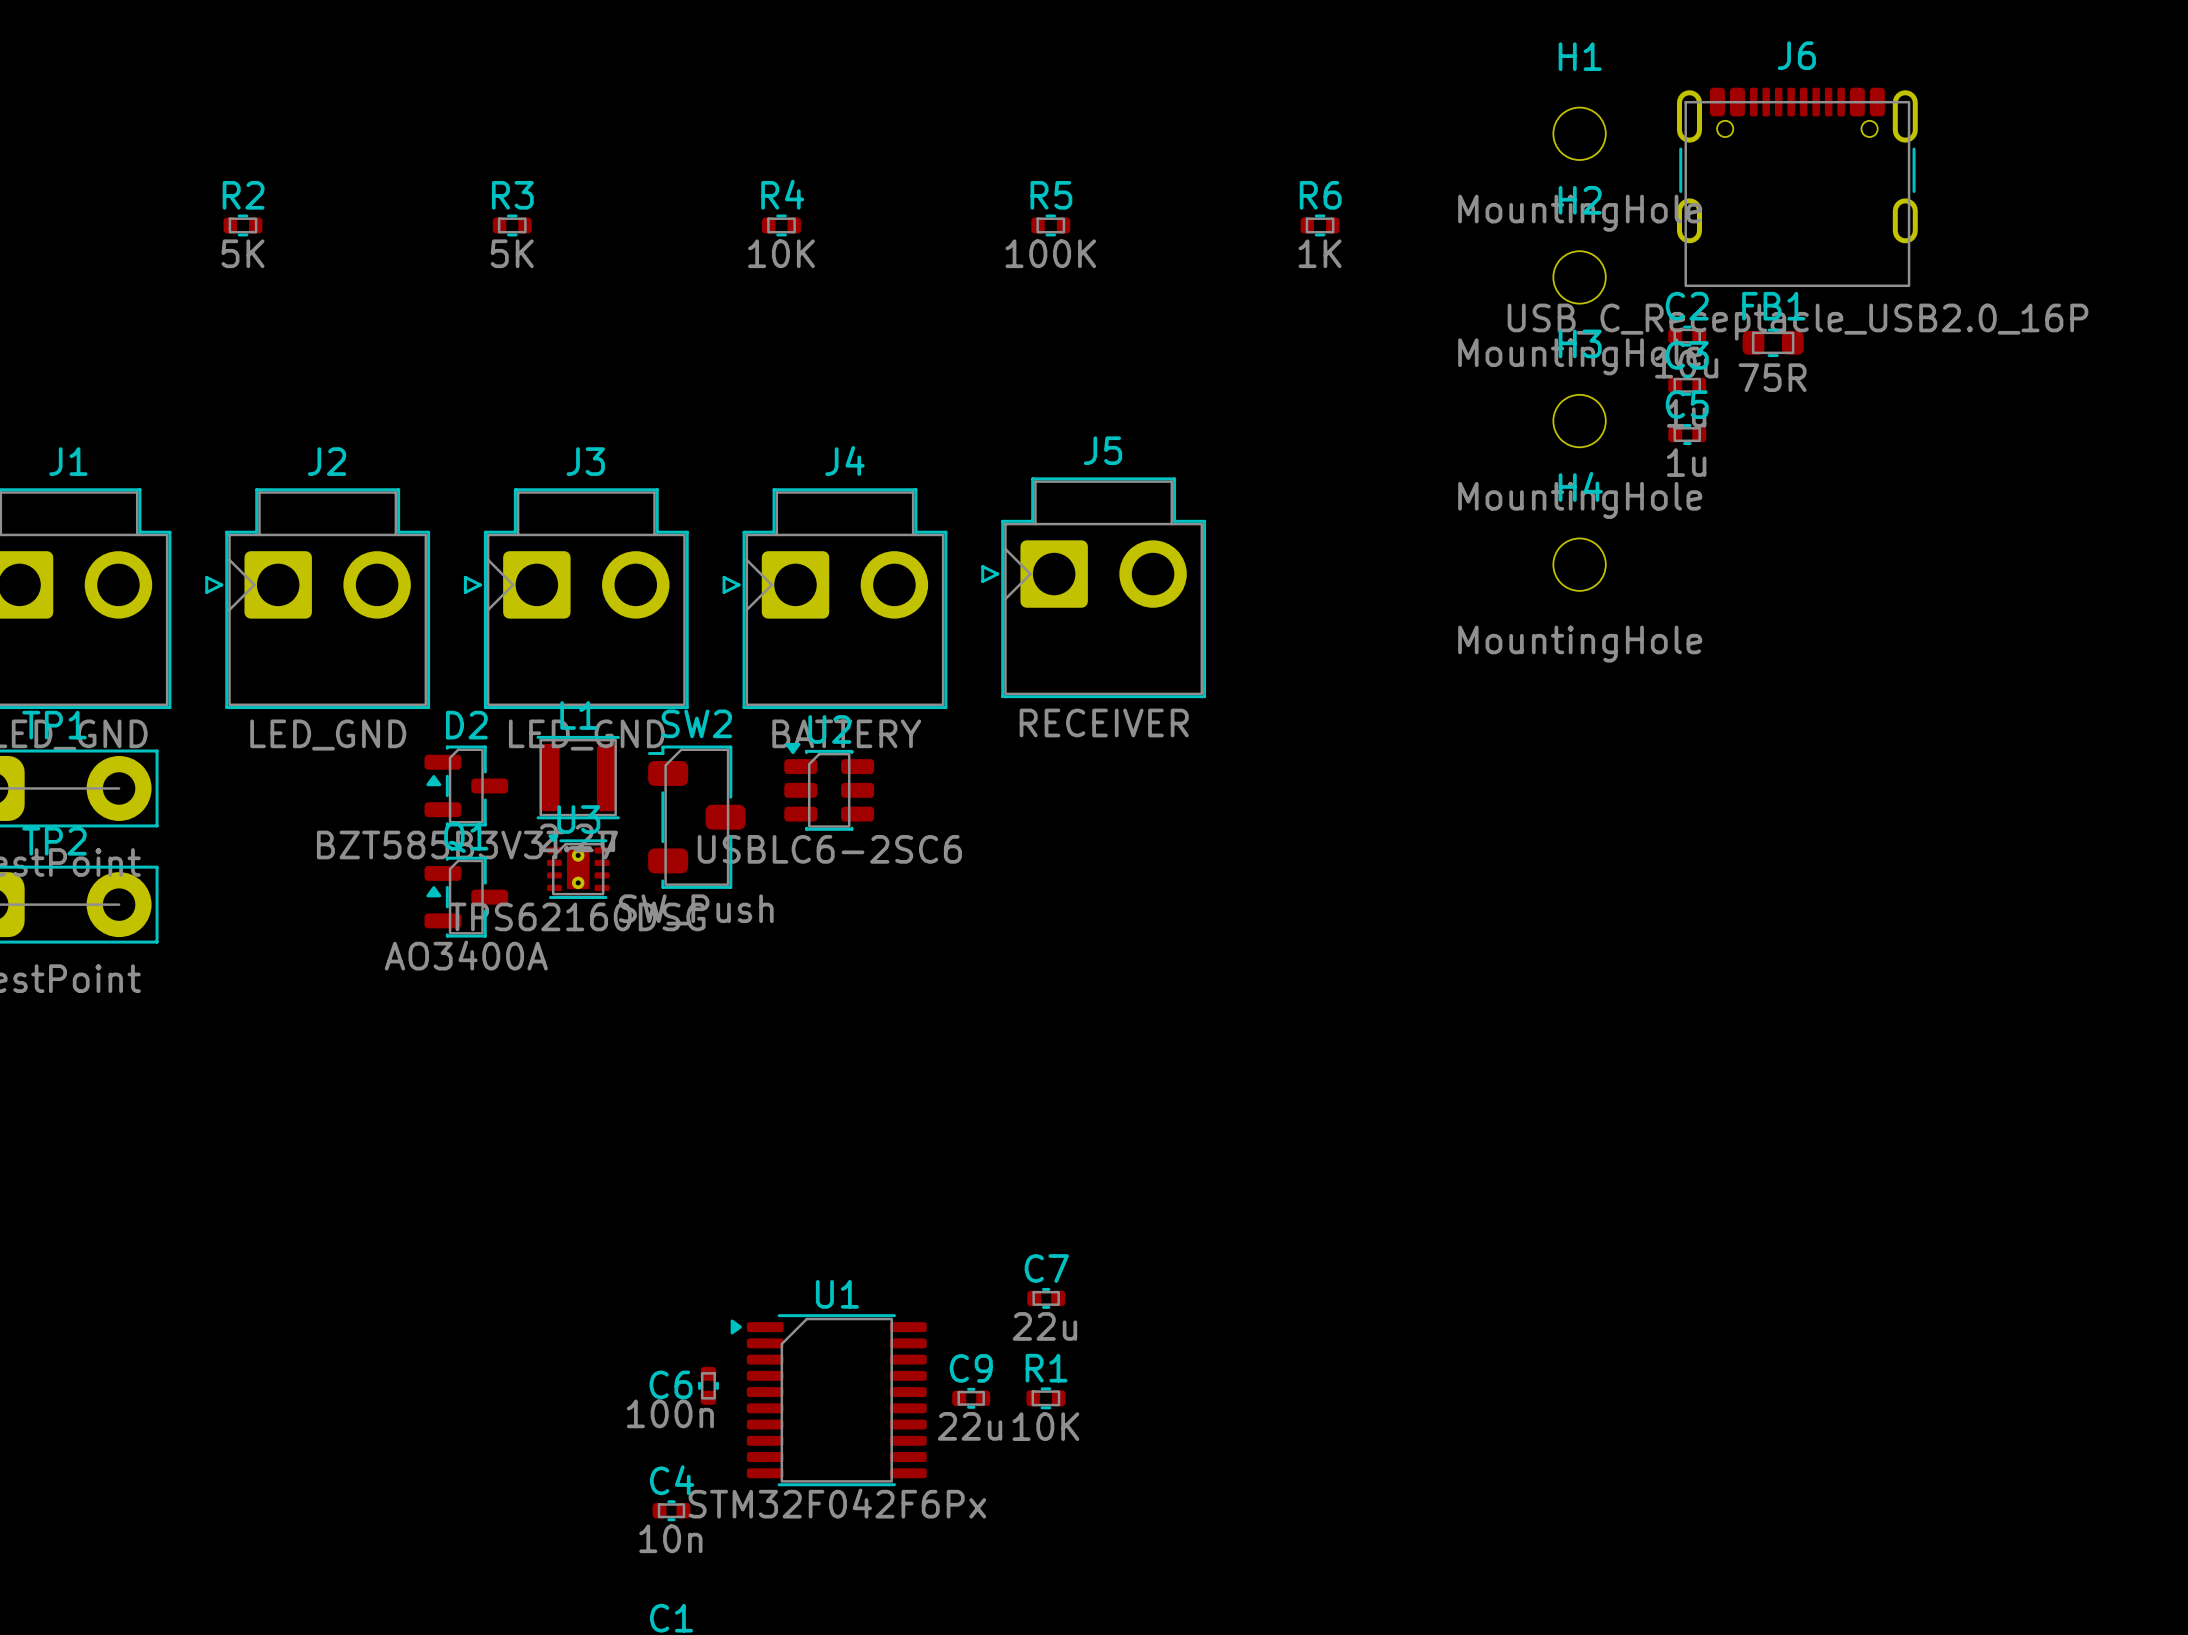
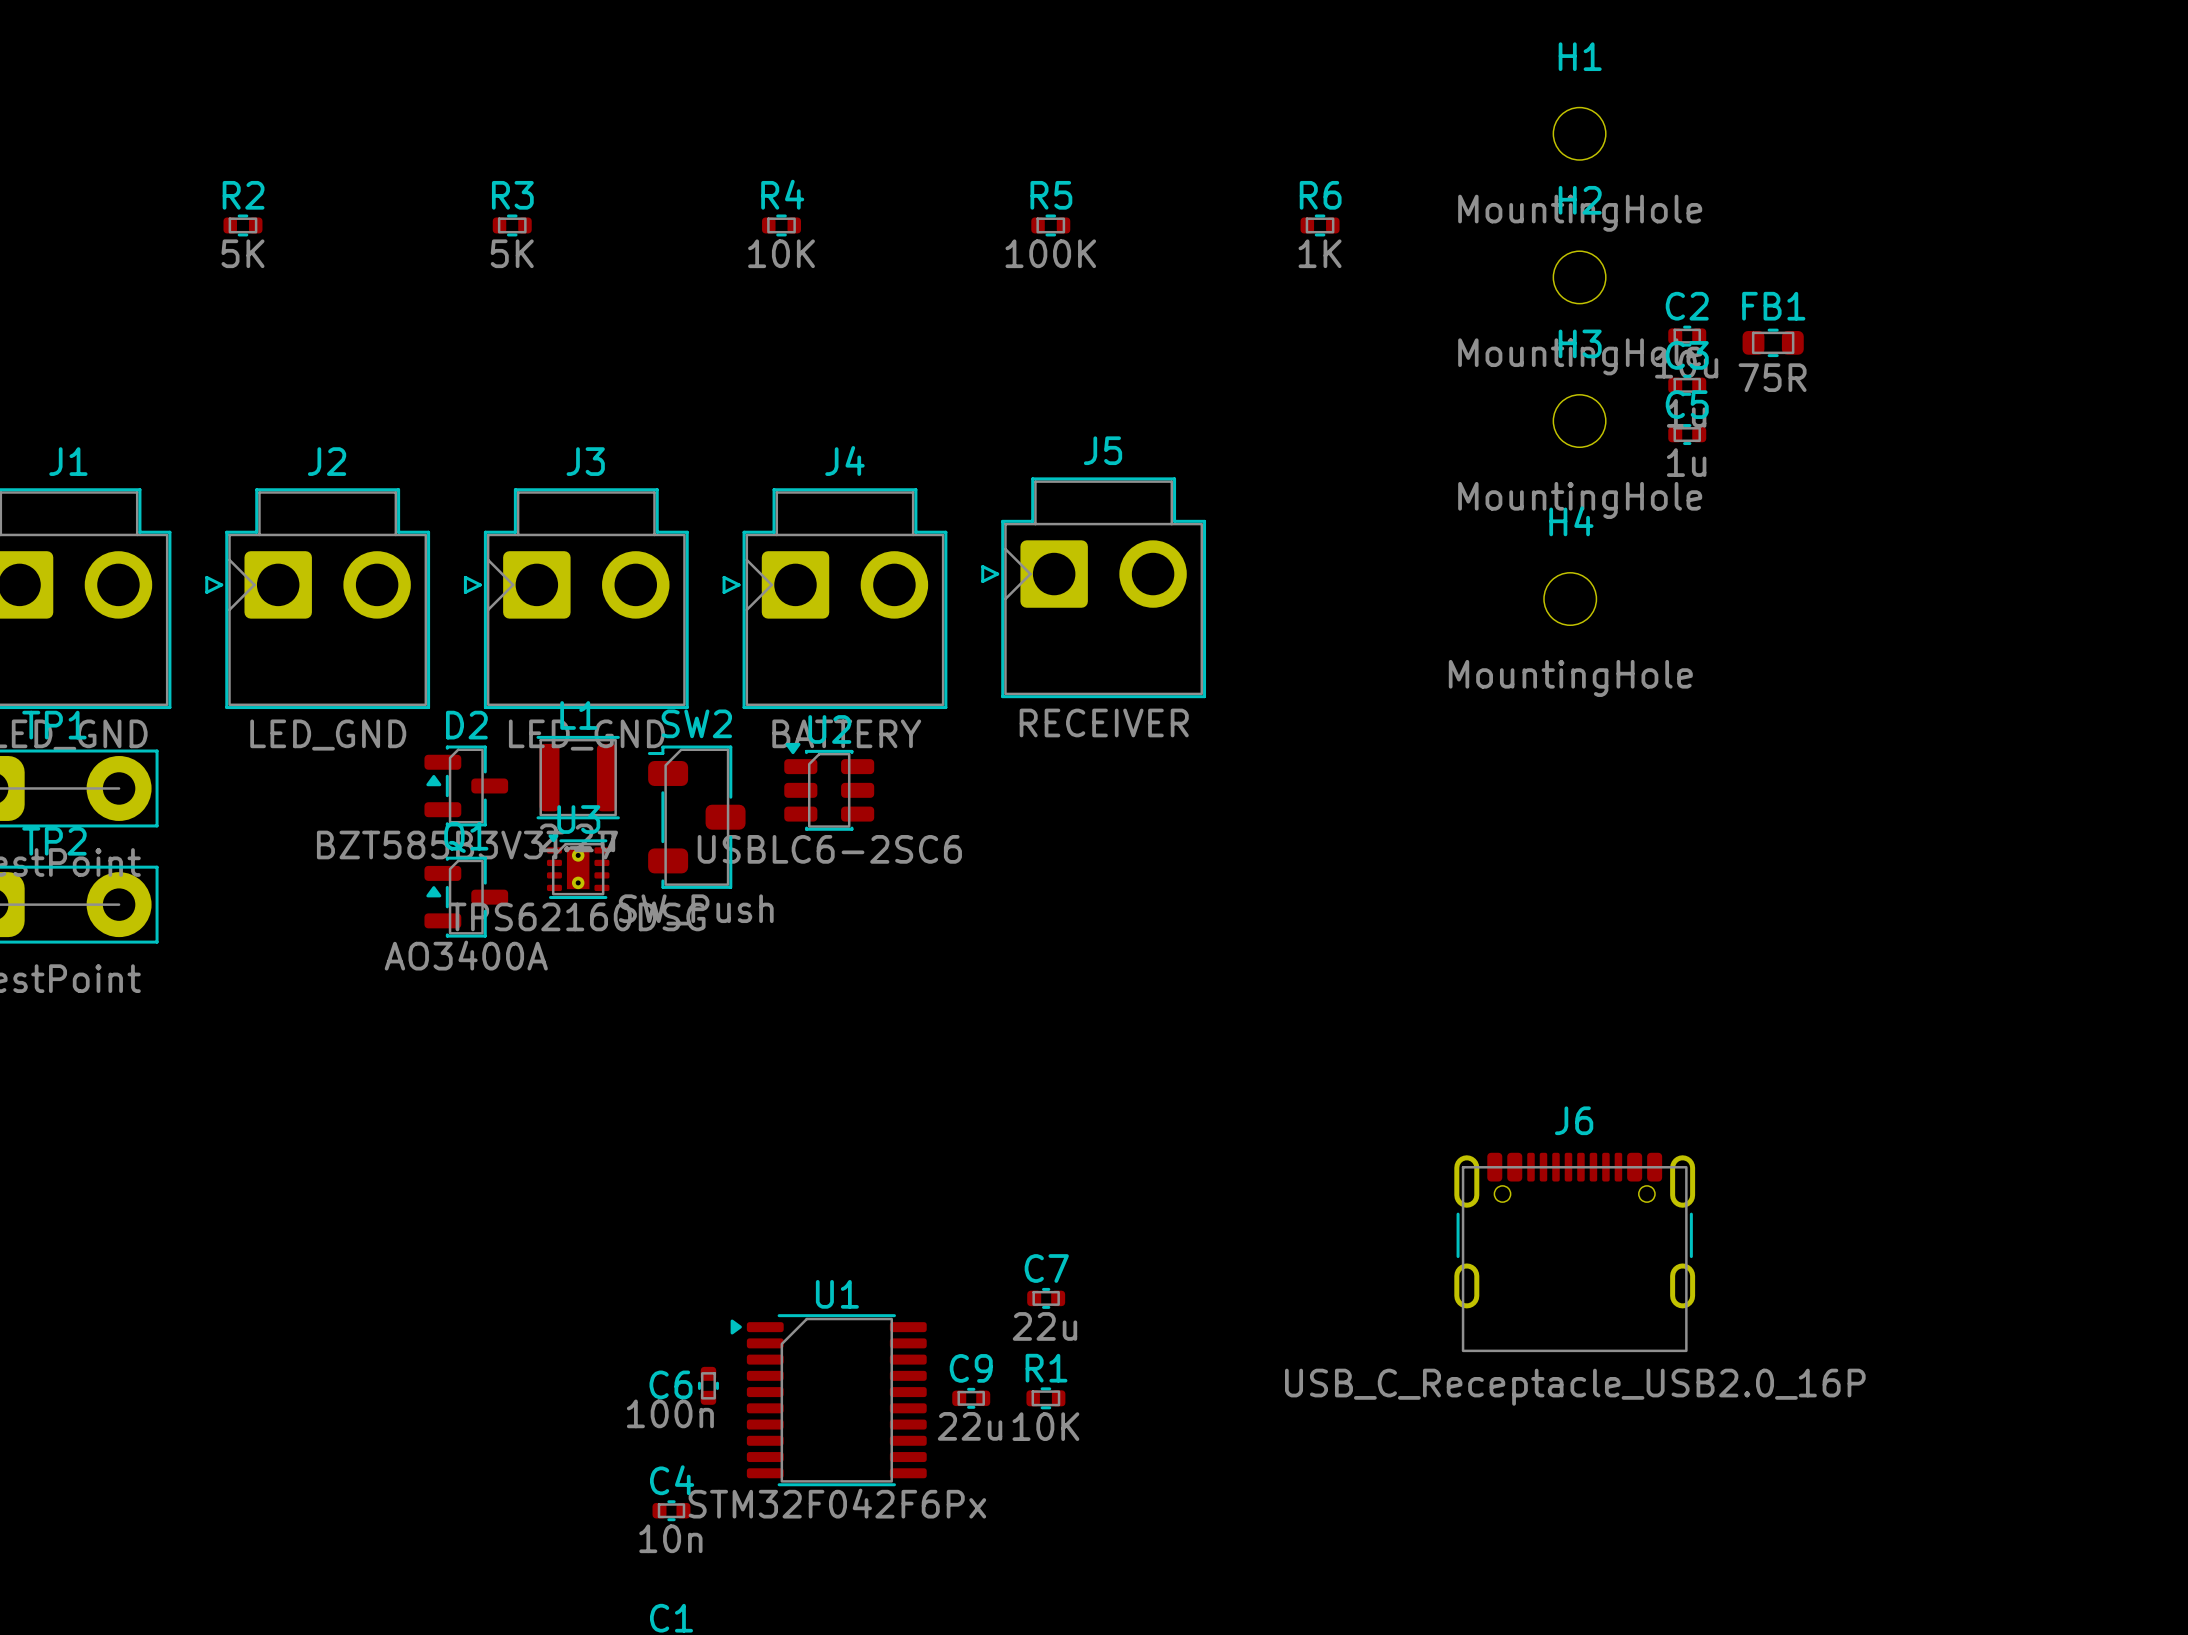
J6 position: (1797, 187) -> (1574, 1252)
H4 position: (1579, 564) -> (1570, 599)

